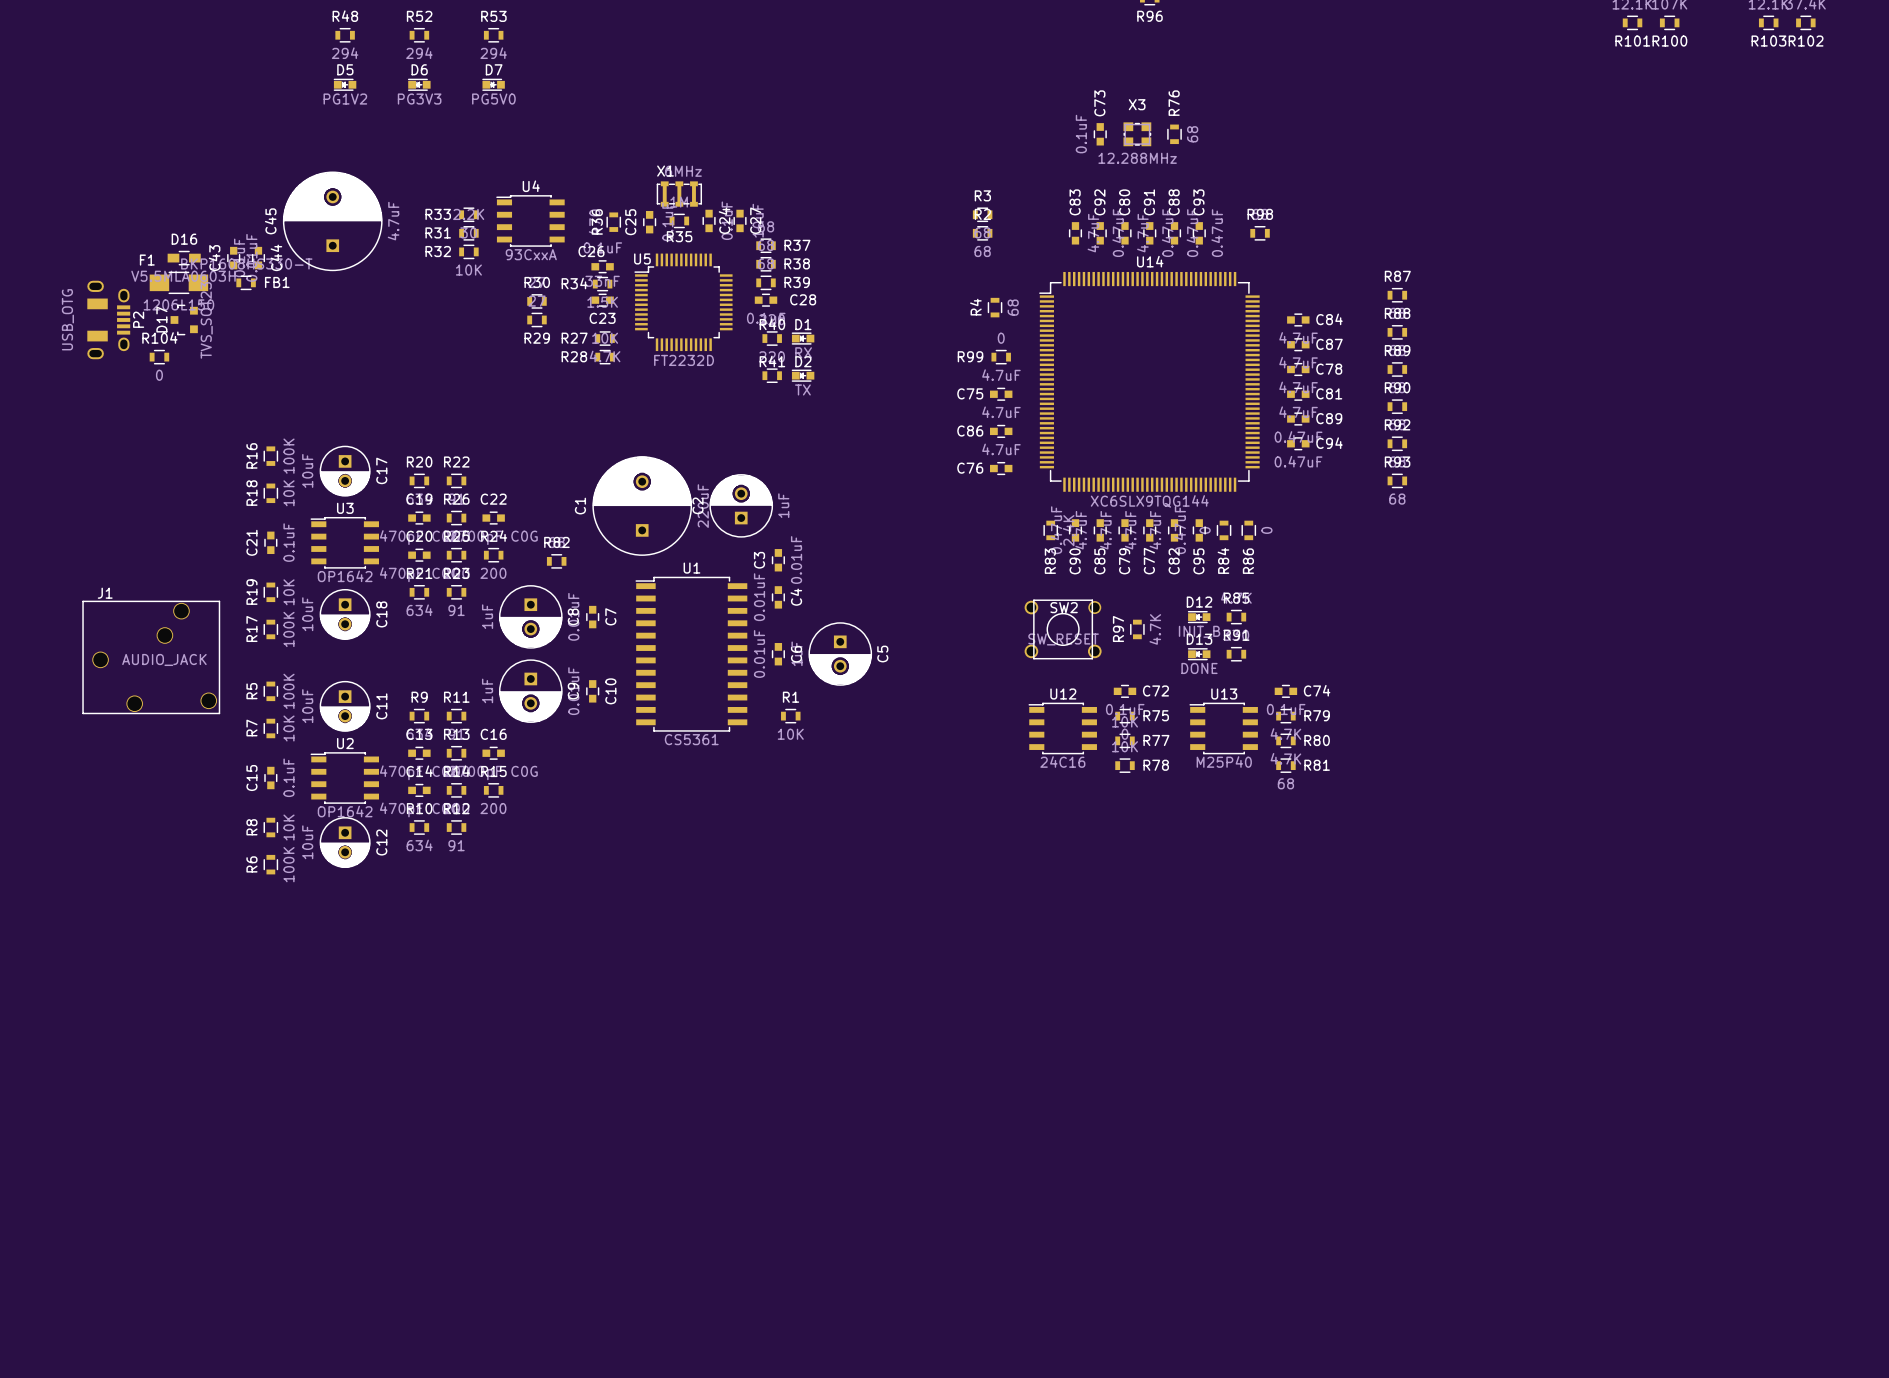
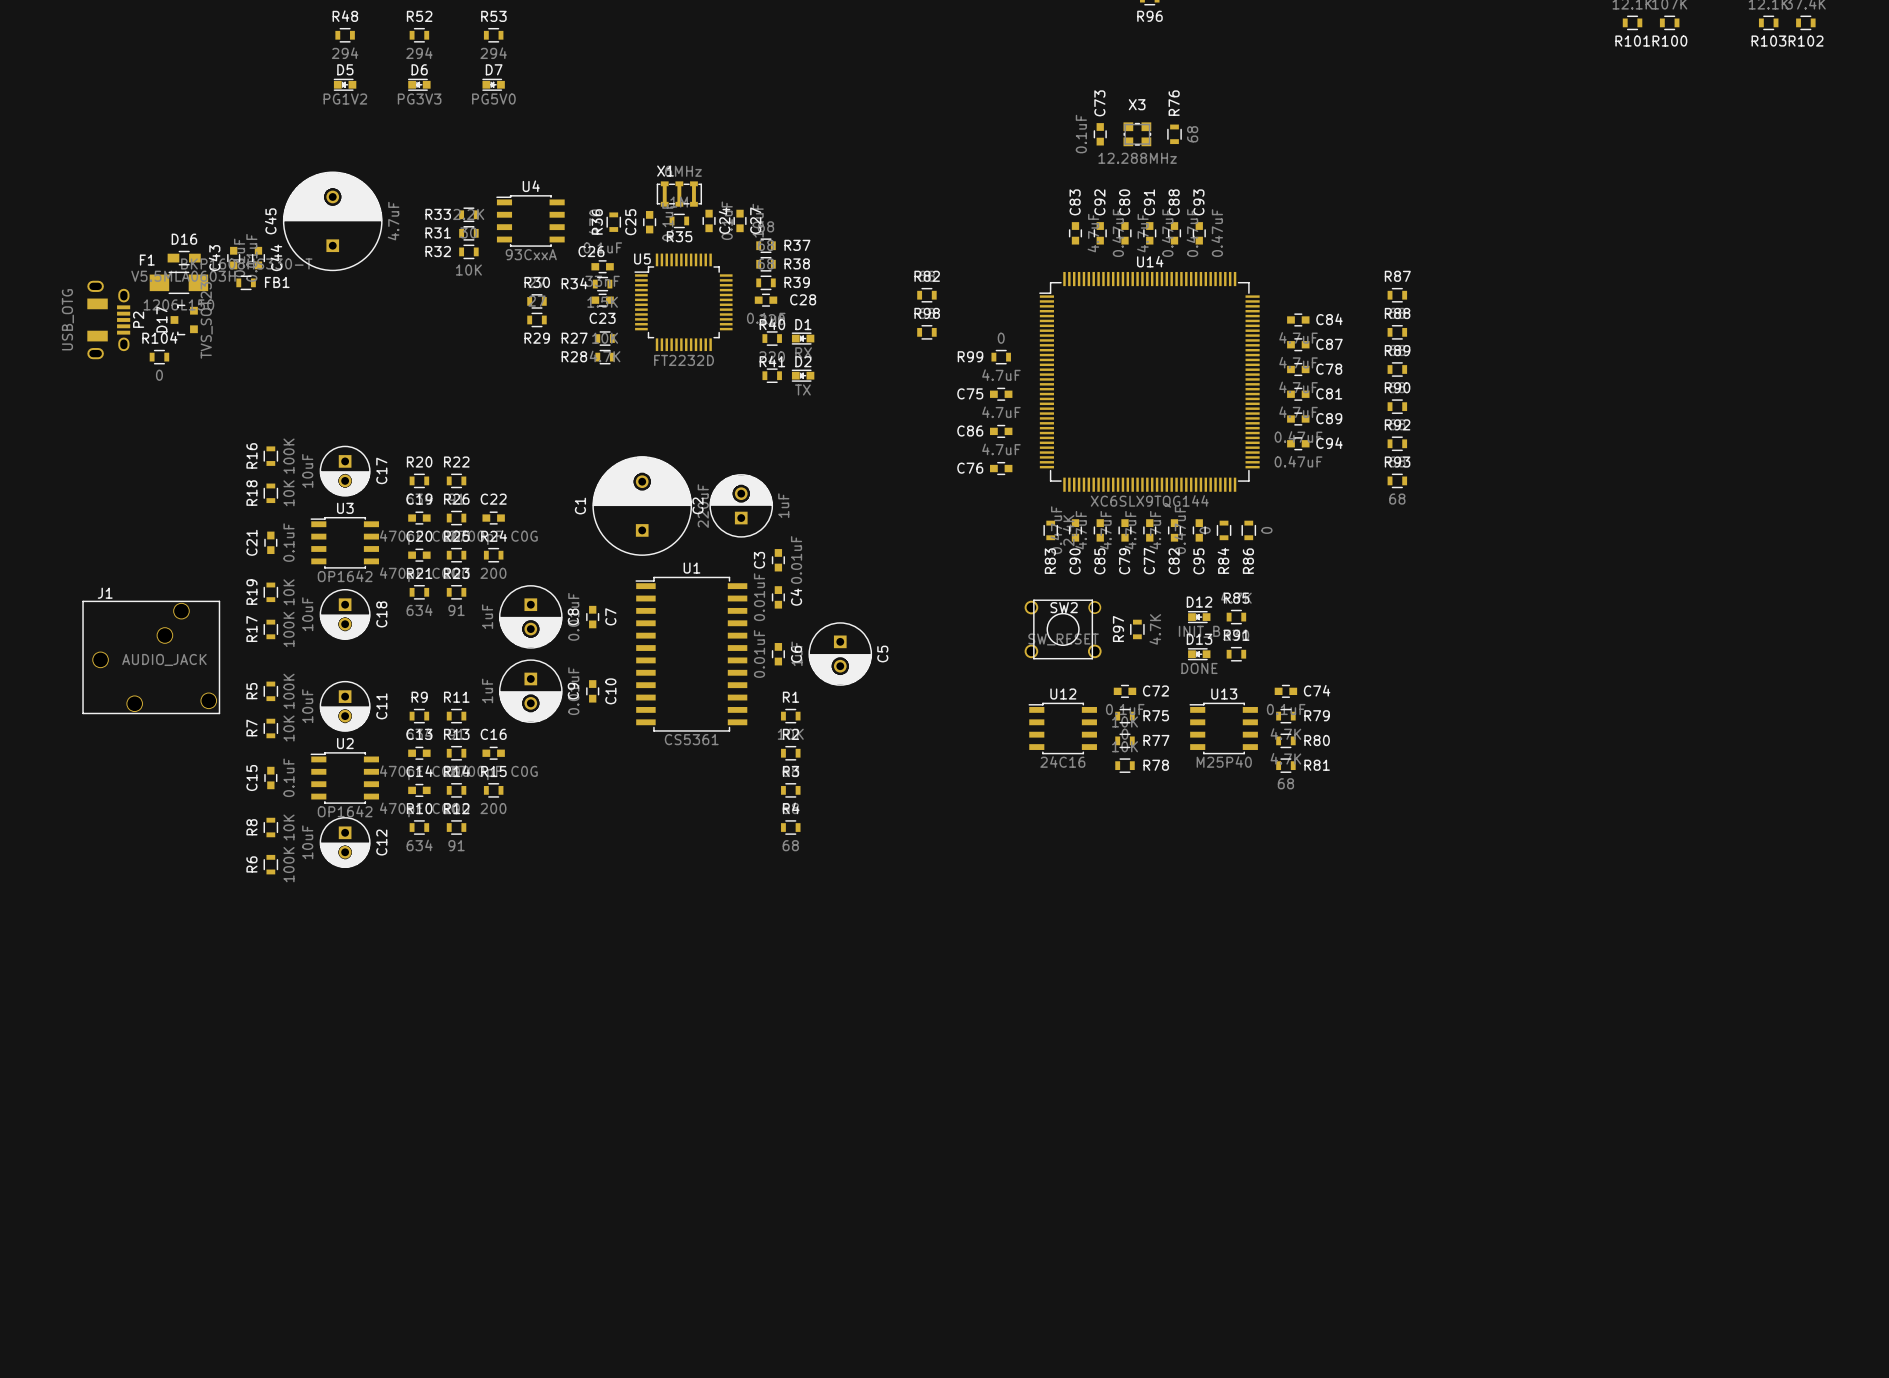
R3 position: (982, 214) -> (790, 790)
R2 position: (982, 233) -> (790, 753)
R98 position: (1260, 233) -> (926, 332)
R4 rotation: 0° (995, 307) -> 90° clockwise (790, 827)
R4 position: (995, 307) -> (790, 827)
R82 position: (556, 561) -> (926, 295)

